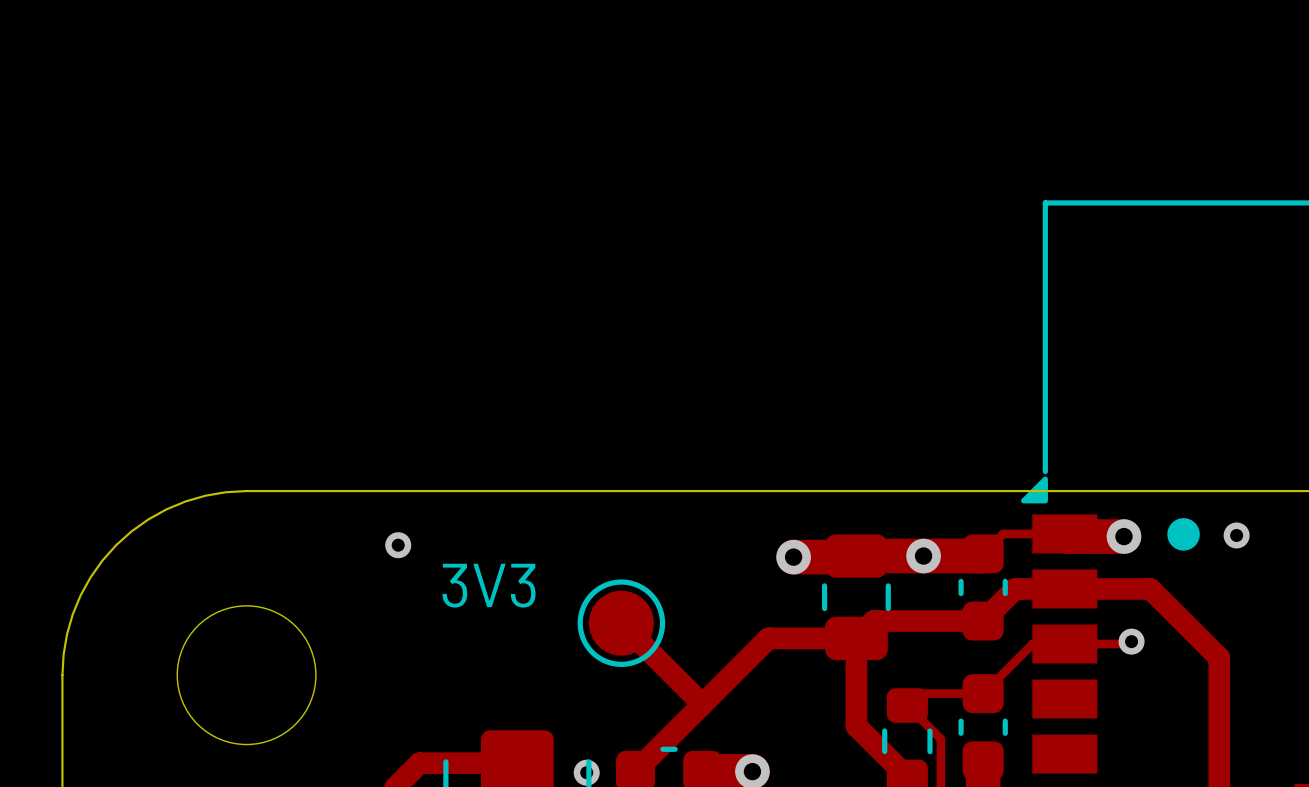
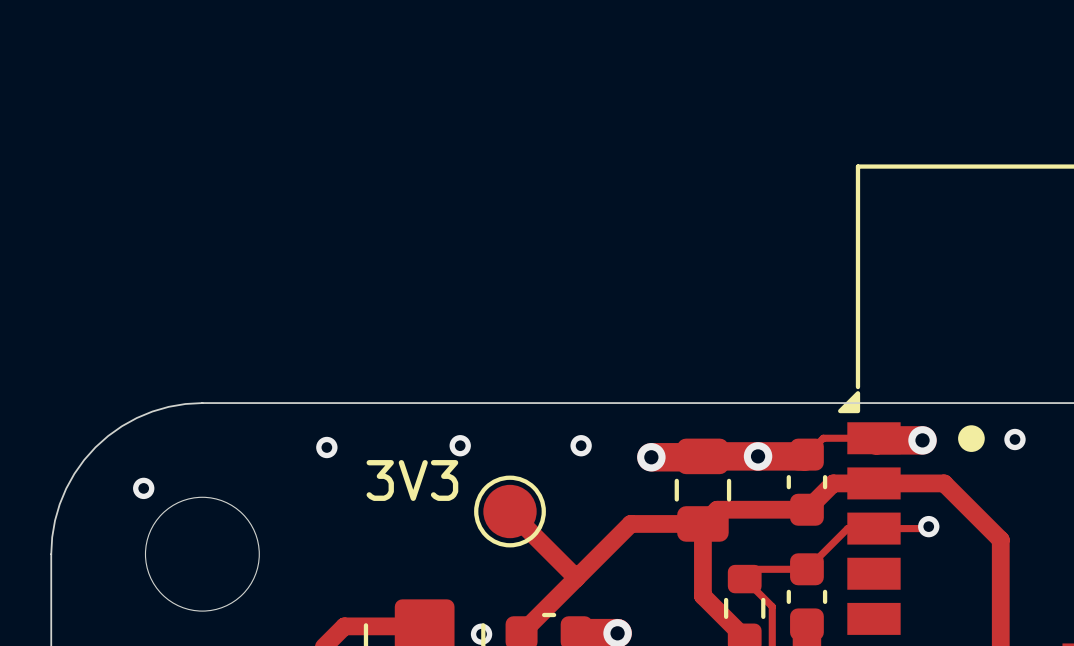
via: none -> (460, 445)
via: none -> (581, 445)
via: none -> (143, 488)

